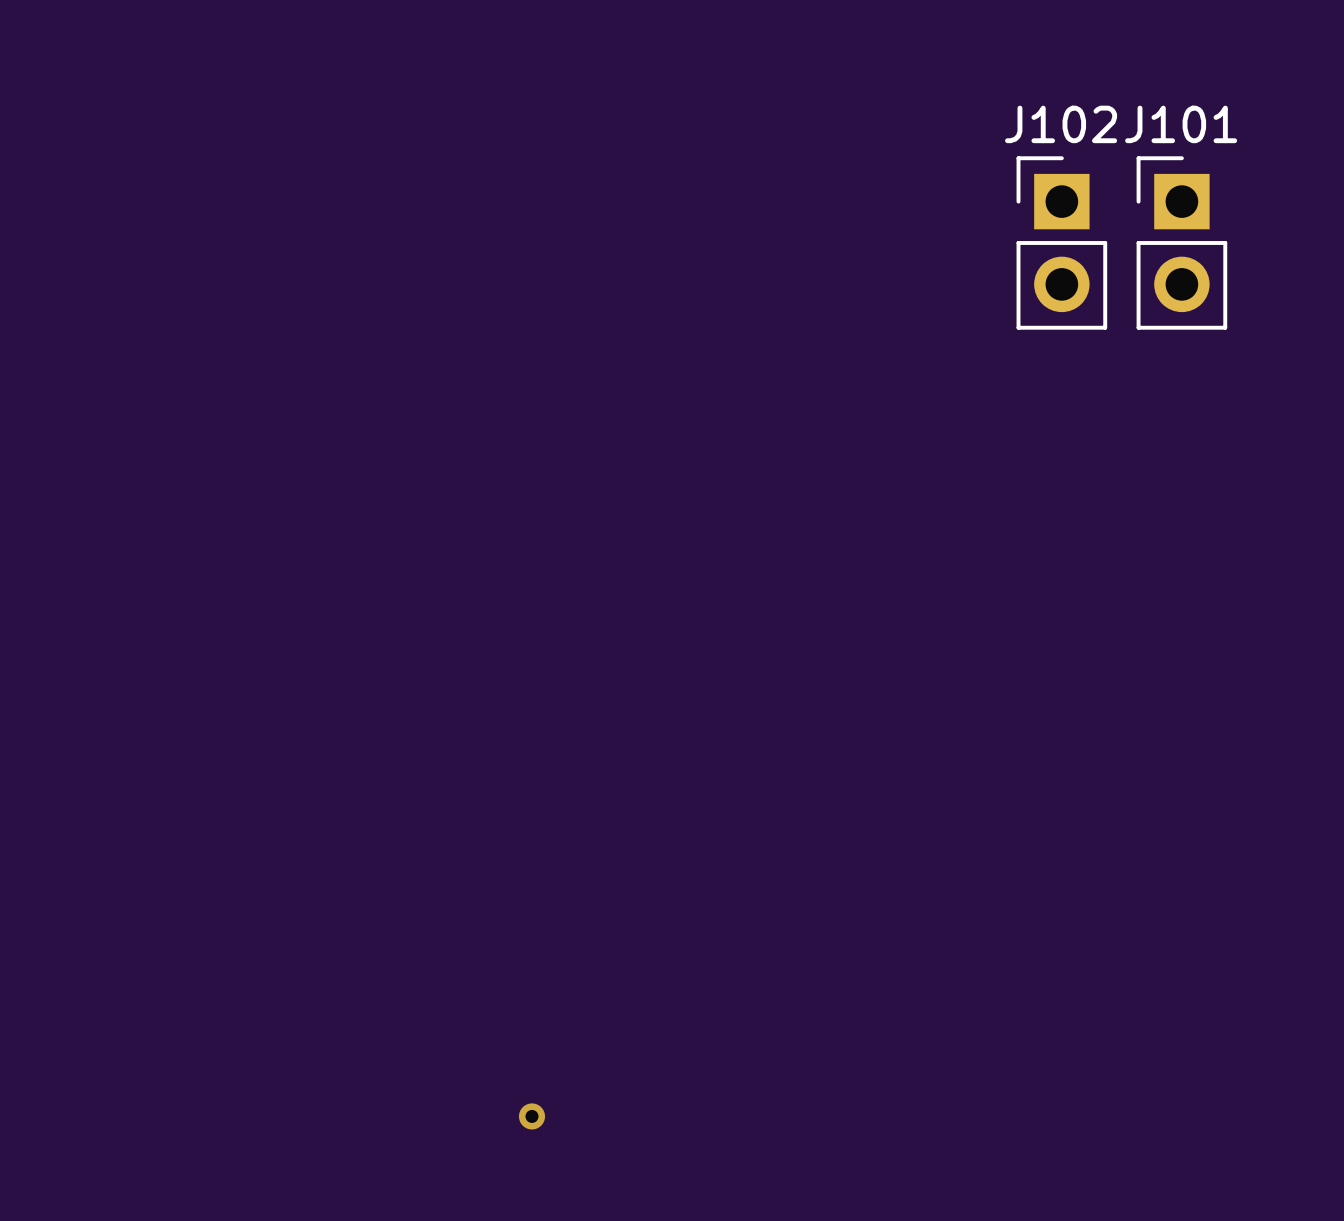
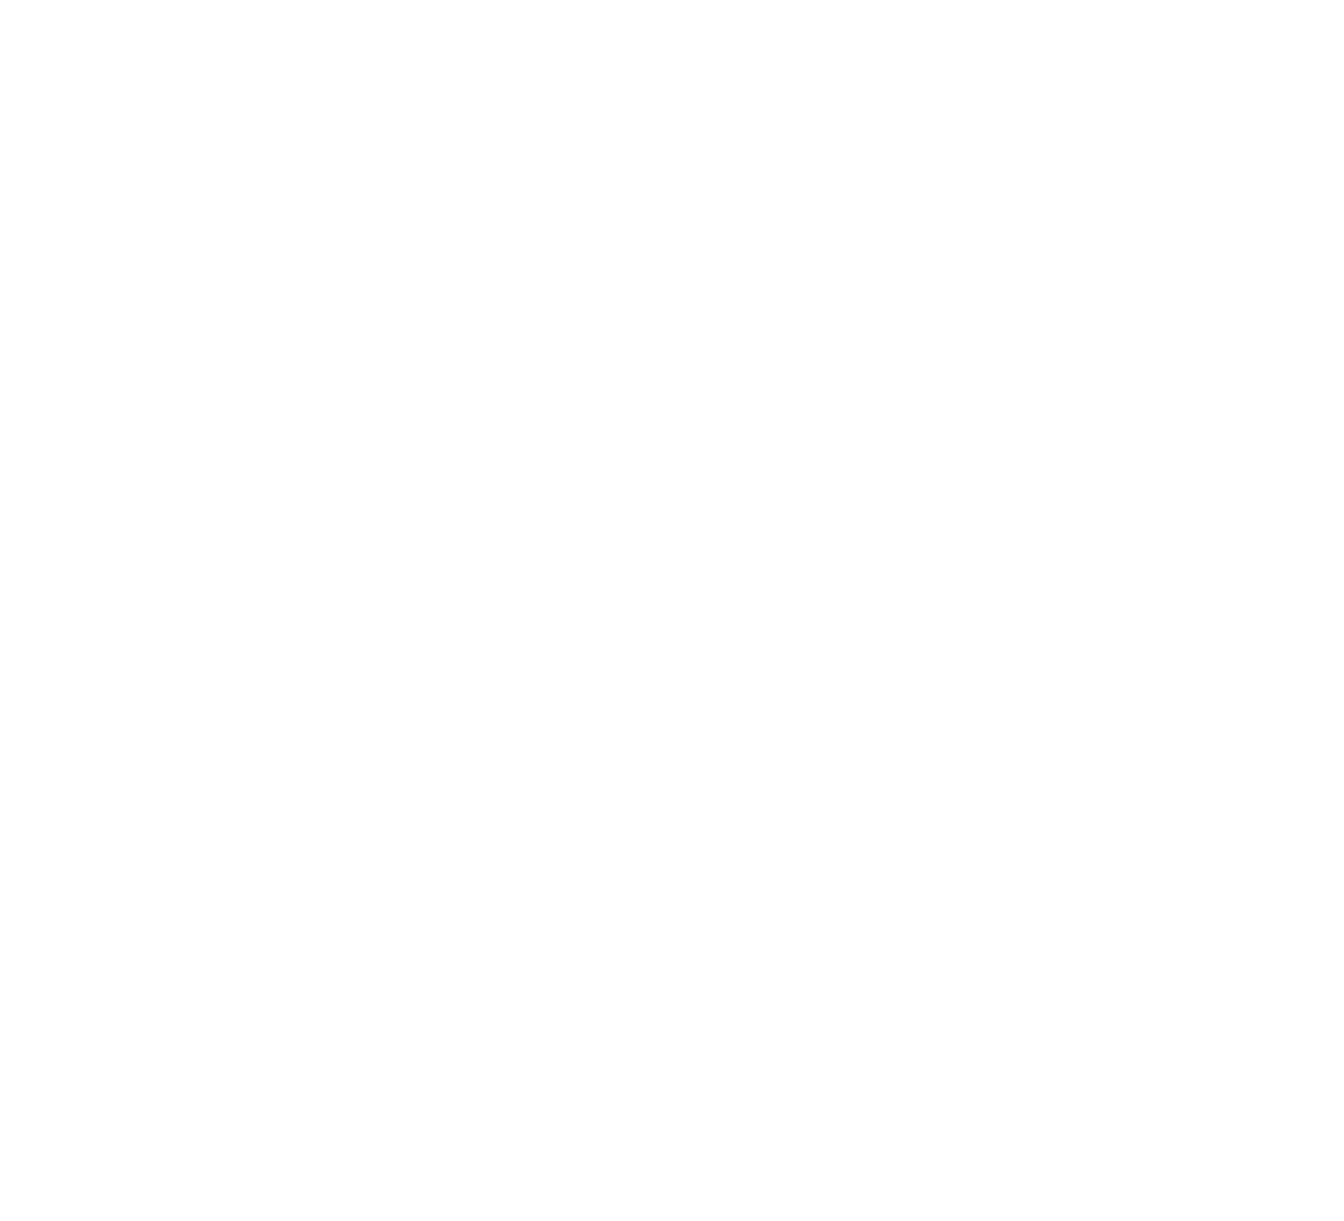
J102: (1061, 242) -> none
J101: (1181, 242) -> none
via: (531, 1116) -> none

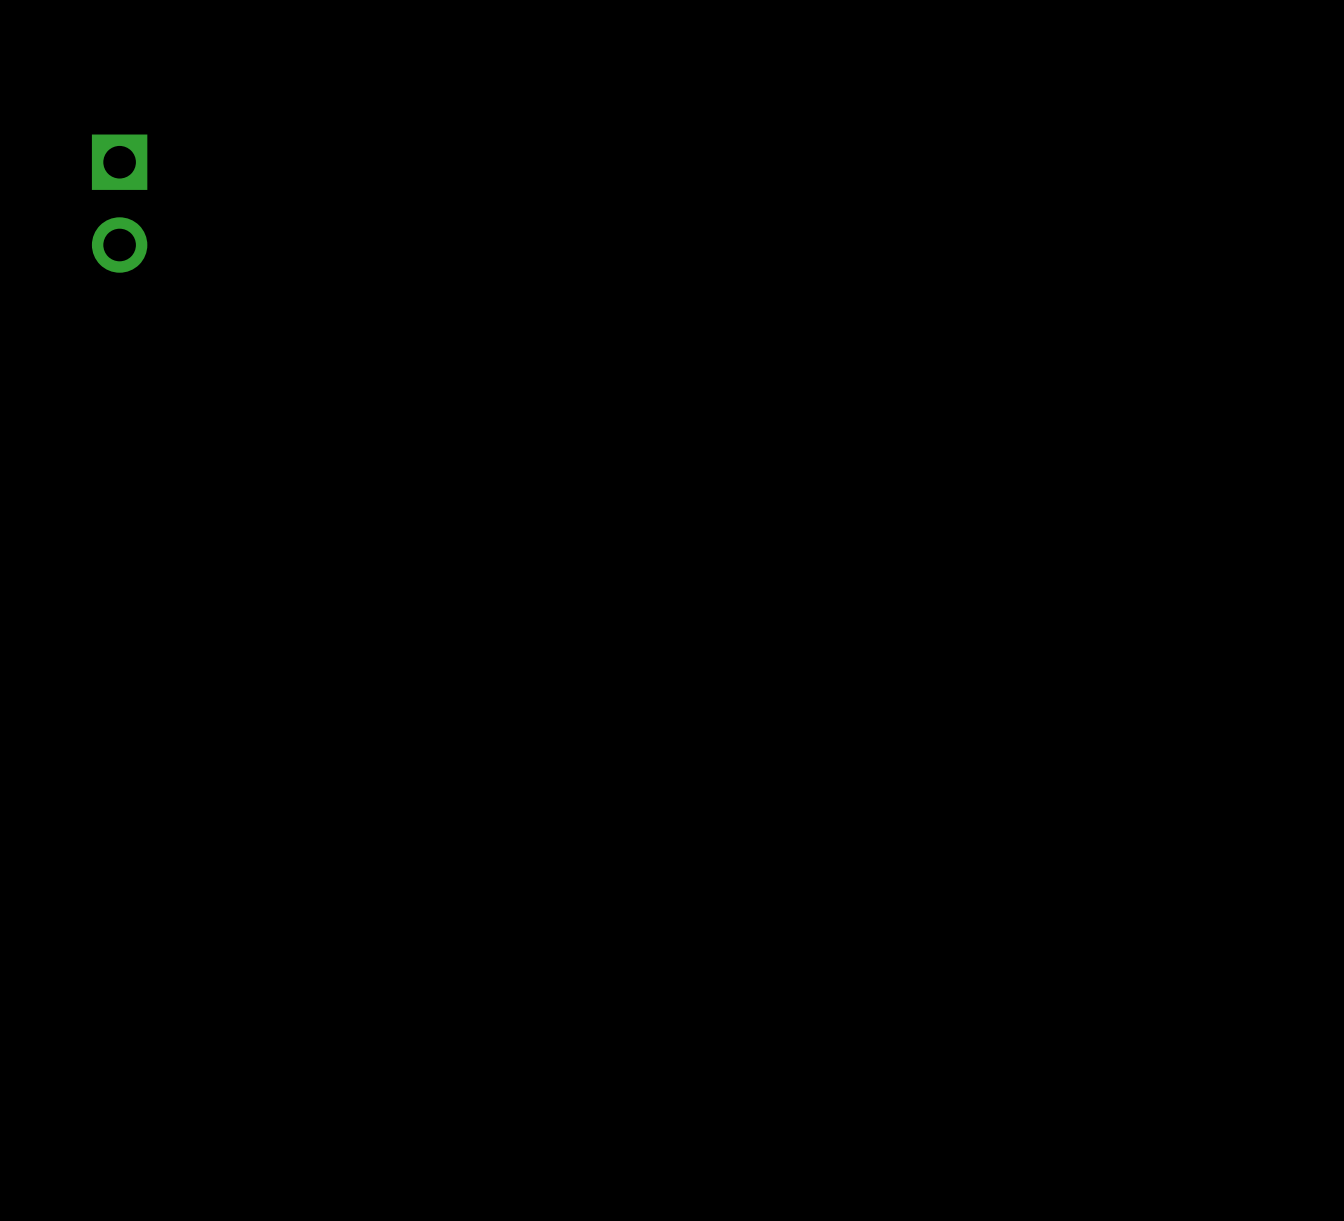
part: none -> (119, 203)

